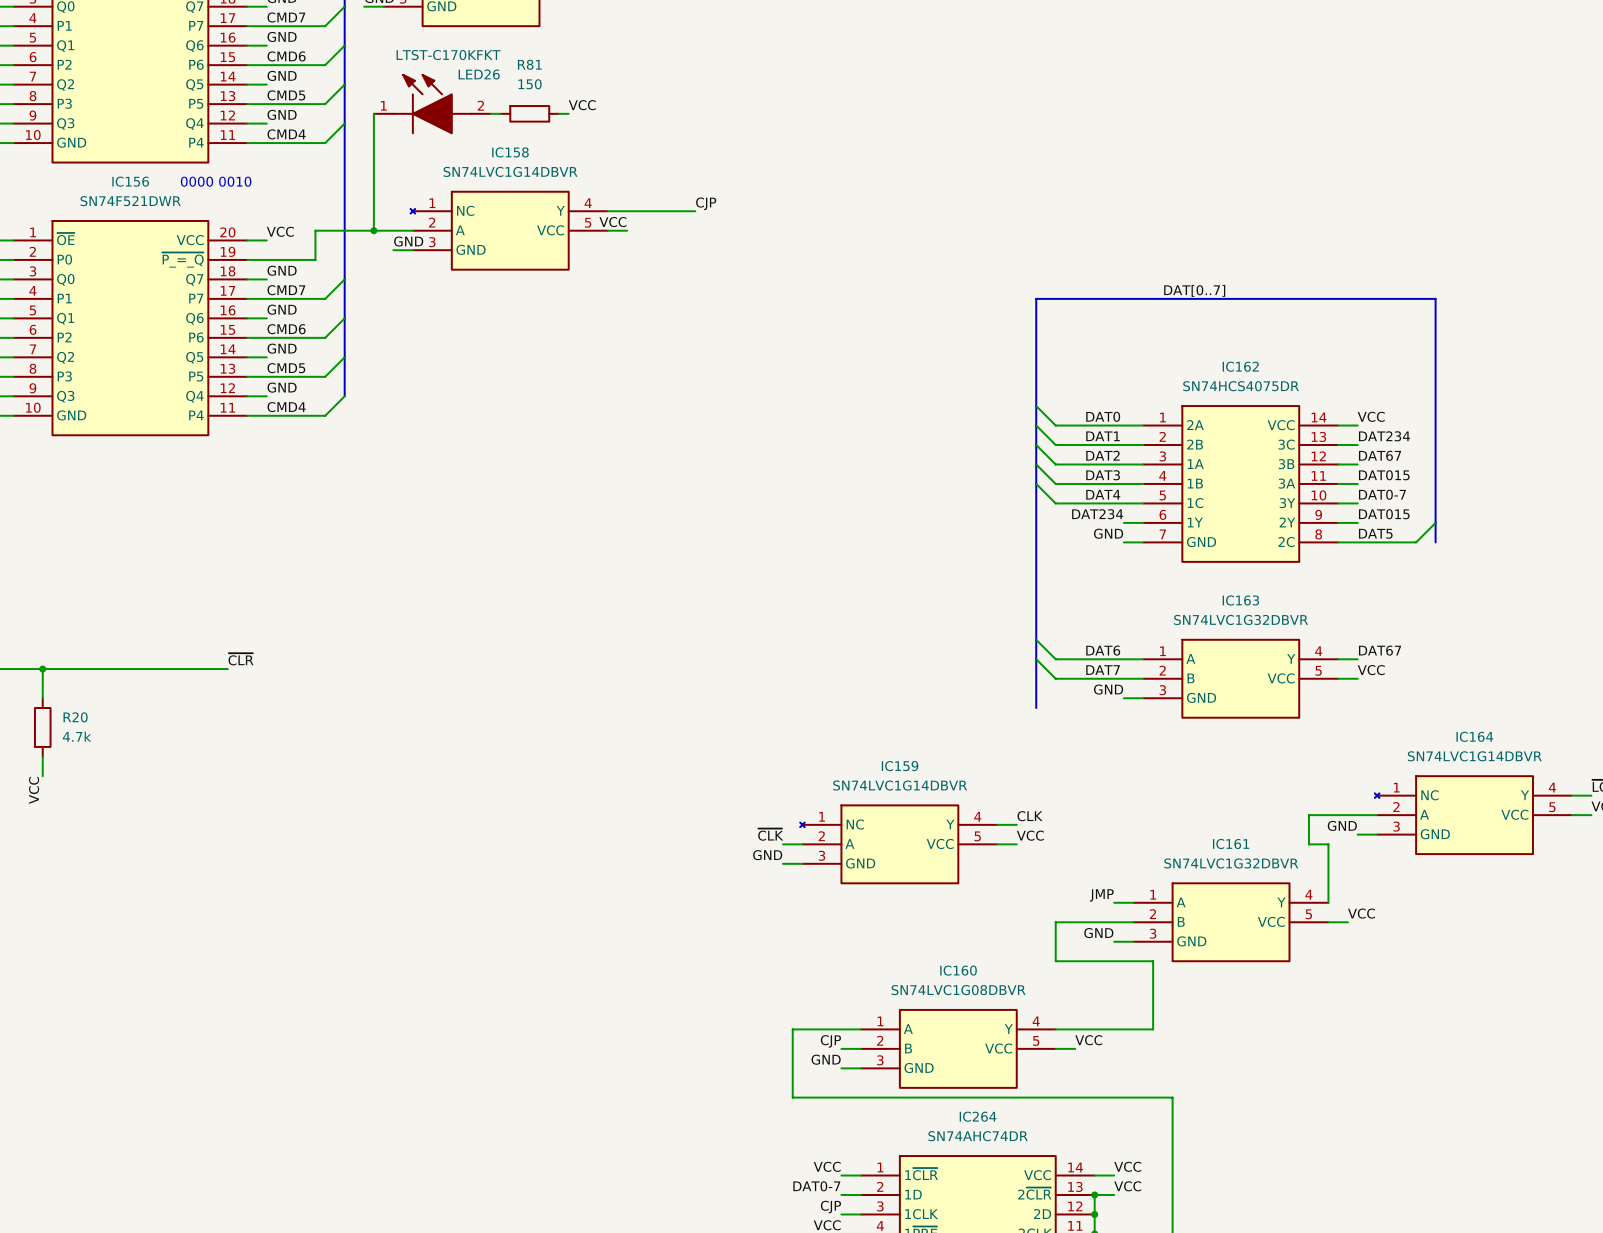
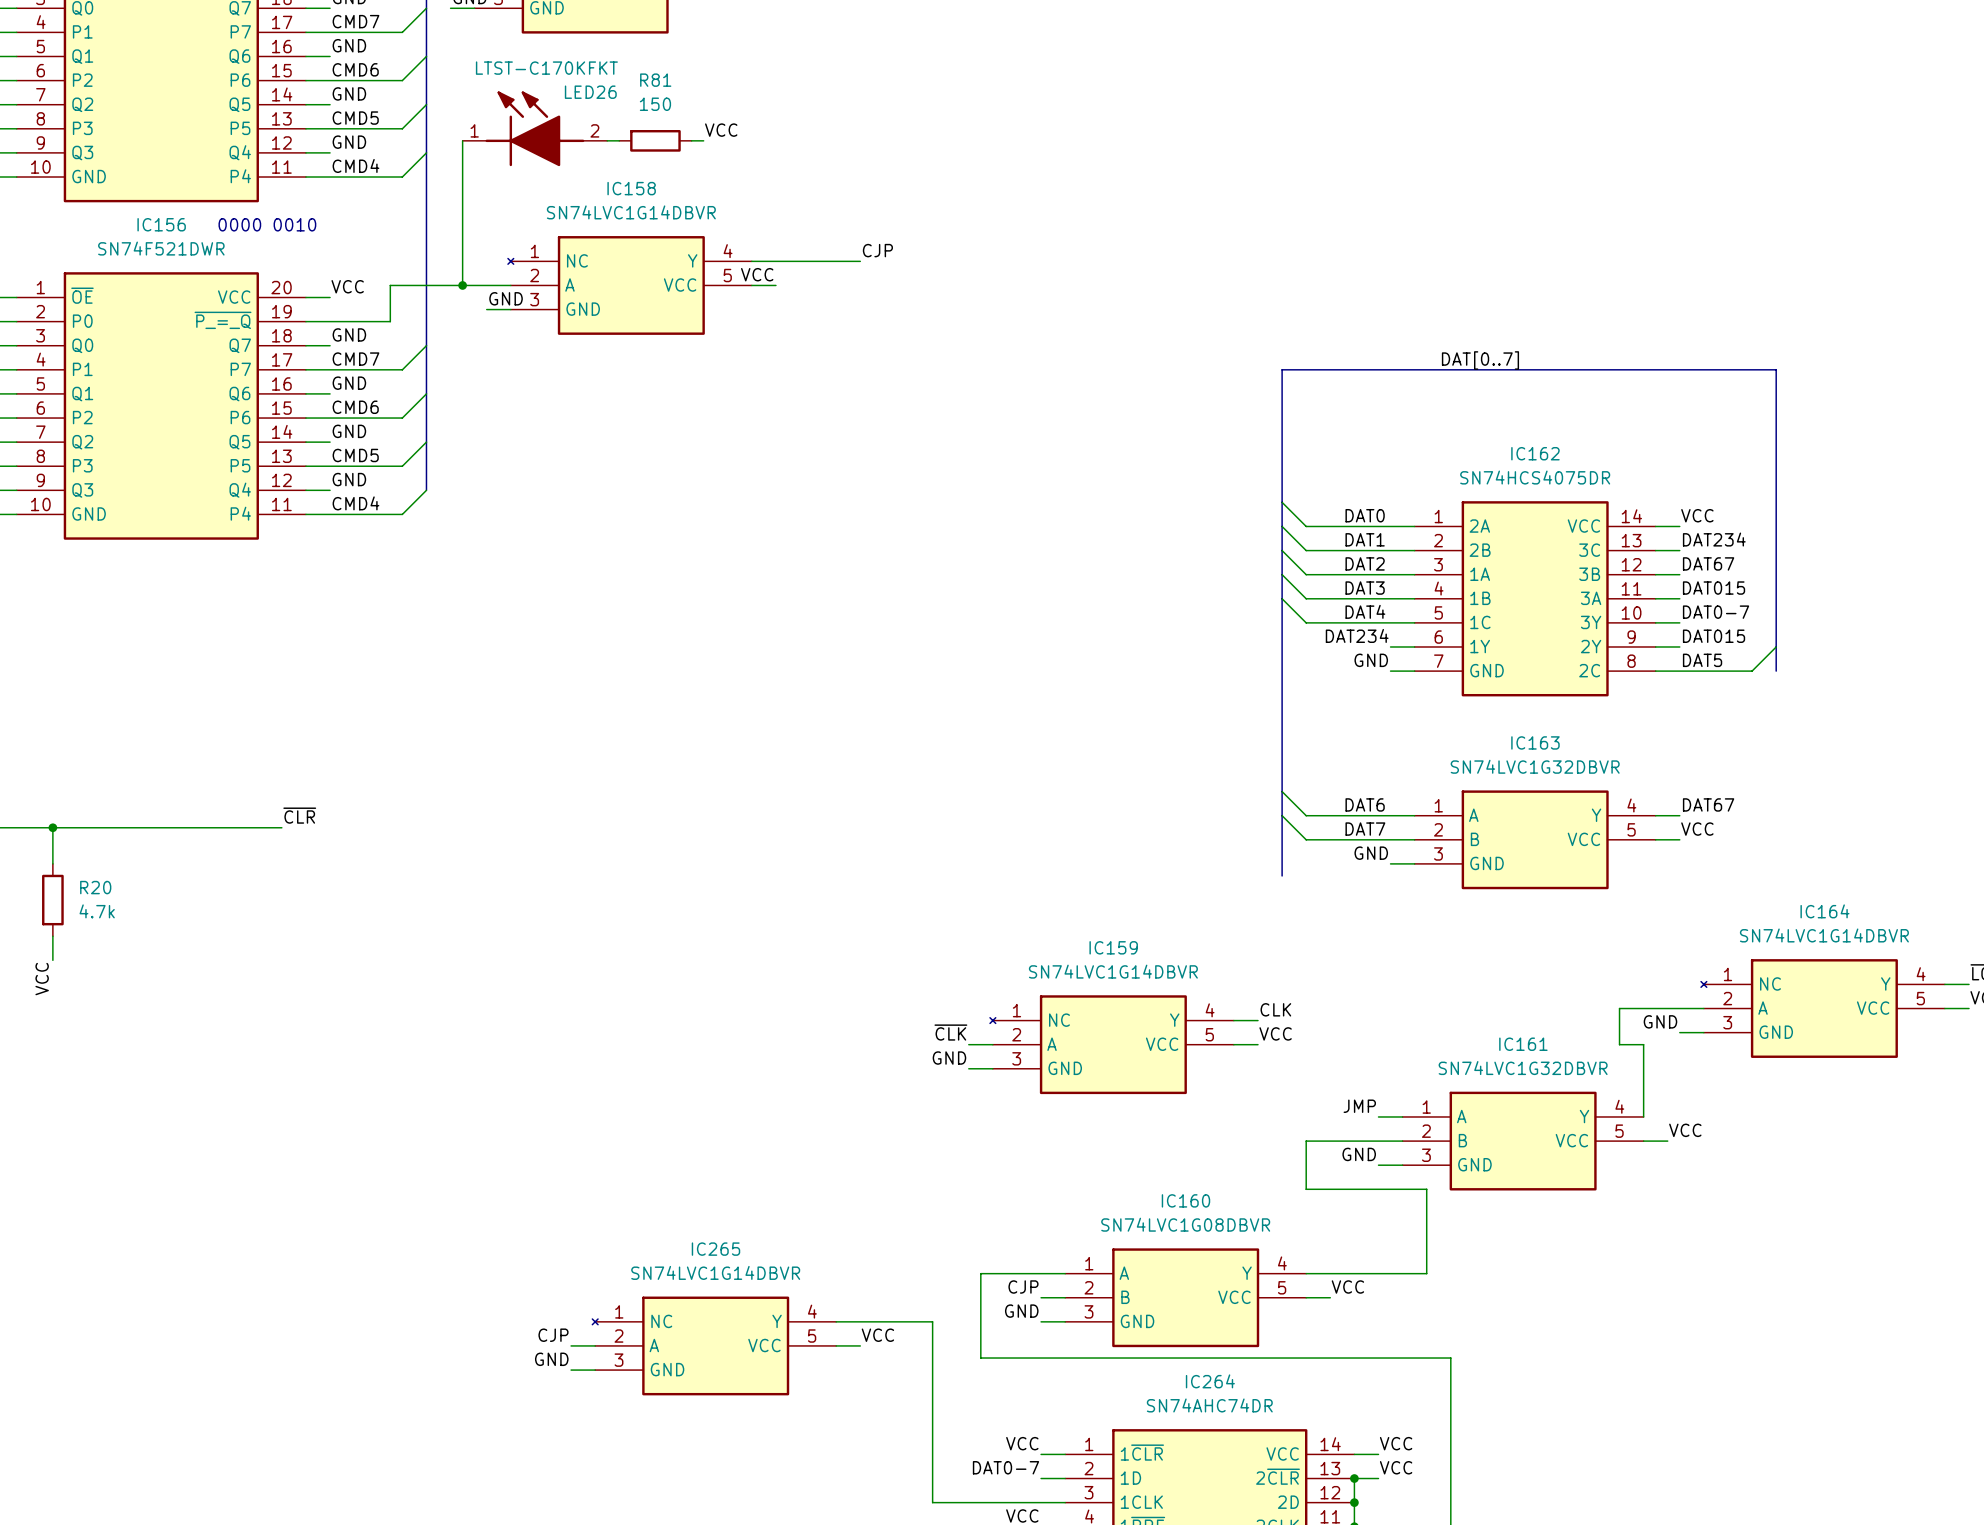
wire: none -> (836, 1321) (932, 1321) (932, 1502) (1041, 1502)
label: none -> VCC (877, 1335)
label: none -> CJP (553, 1335)
wire: none -> (571, 1345) (595, 1345)
IC265: none -> SN74LVC1G14DBVR (714, 1345)
wire: none -> (836, 1345) (860, 1345)
label: none -> GND (551, 1359)
wire: none -> (571, 1370) (595, 1370)
label: CJP (830, 1207) -> none

